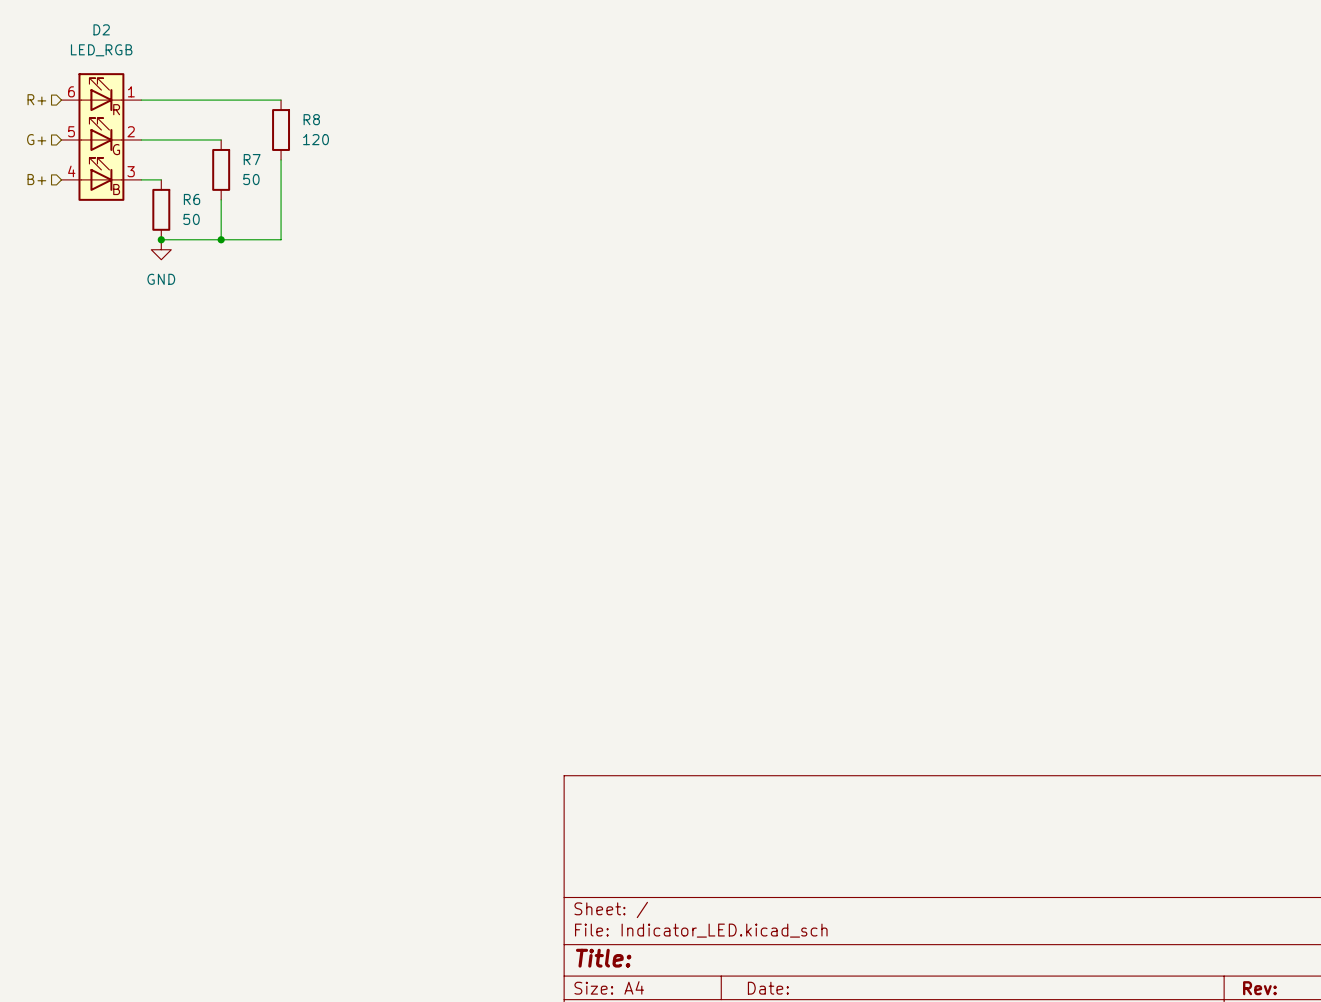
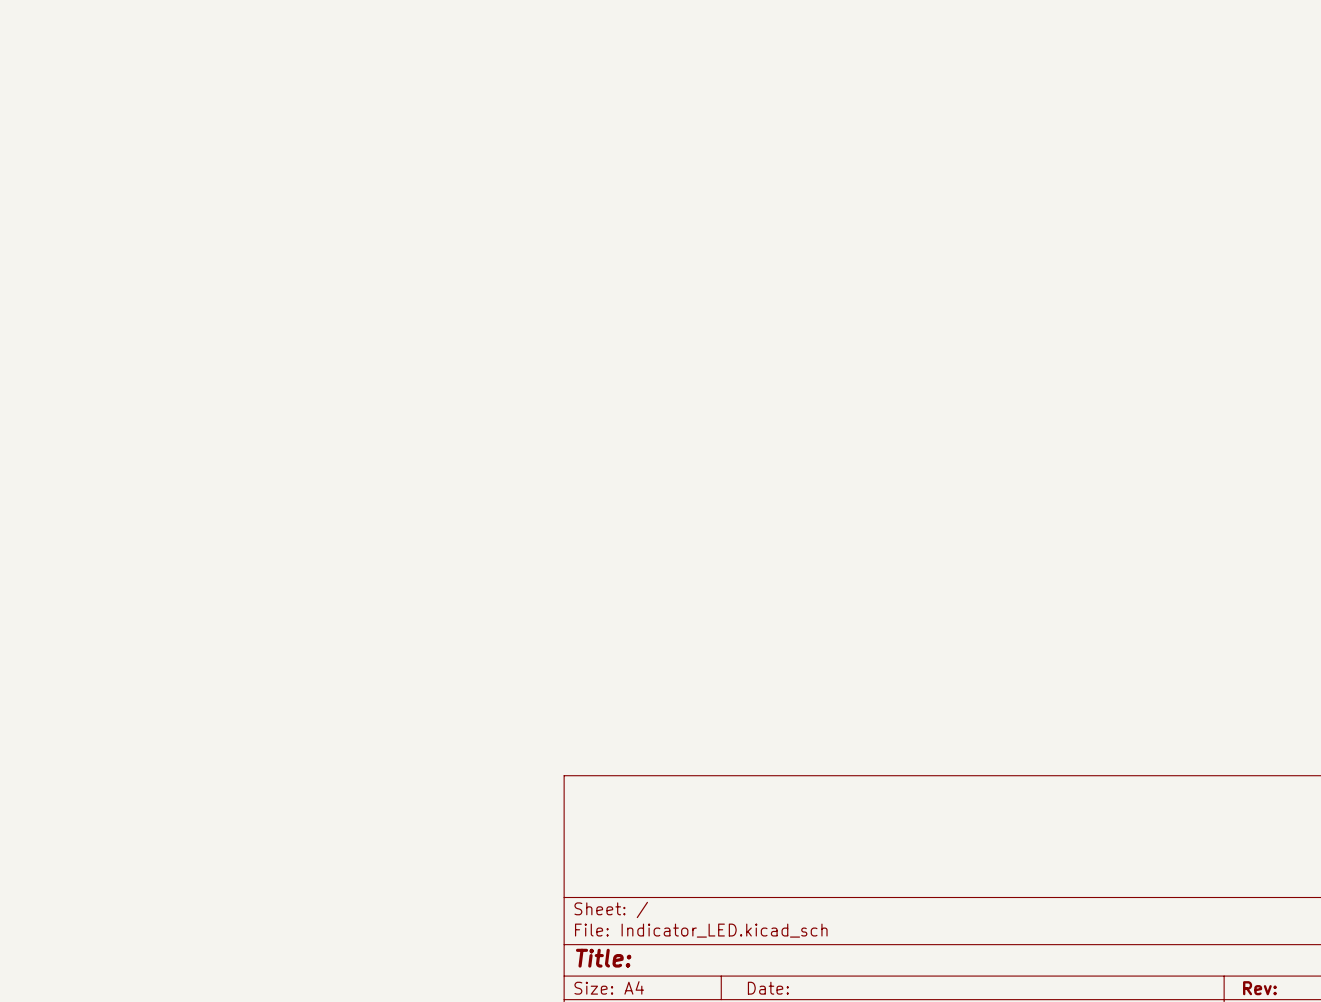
hierarchical label: R+ (36, 99) -> none
wire: (141, 100) (281, 100) -> none
R8: 120 (281, 130) -> none
D2: LED_RGB (101, 137) -> none
hierarchical label: G+ (36, 139) -> none
wire: (141, 139) (221, 139) -> none
wire: (281, 159) (281, 239) (161, 239) -> none
R7: 50 (221, 169) -> none
hierarchical label: B+ (36, 179) -> none
wire: (141, 179) (161, 179) -> none
wire: (221, 199) (221, 239) -> none
R6: 50 (161, 209) -> none
junction: (161, 239) -> none
junction: (221, 239) -> none
power symbol: GND (161, 249) -> none

